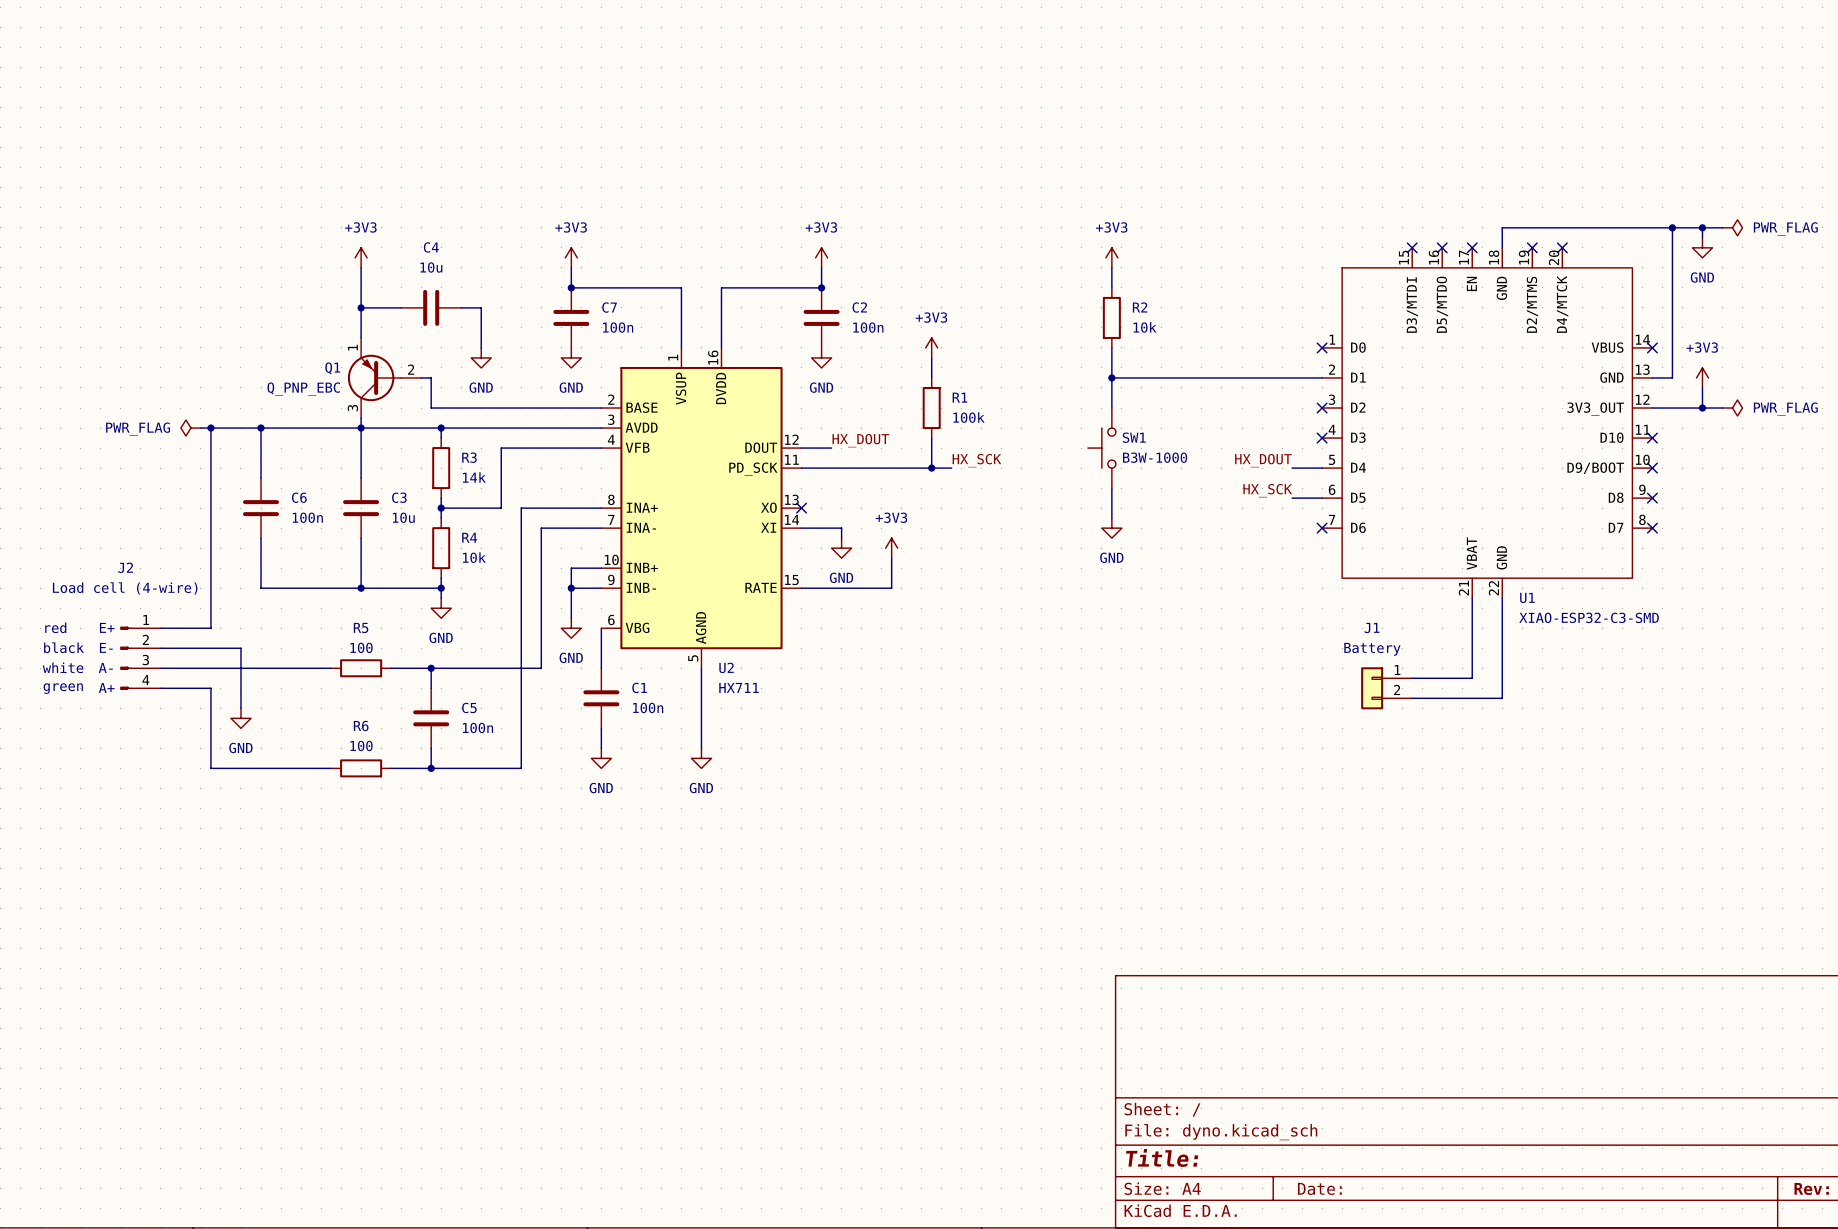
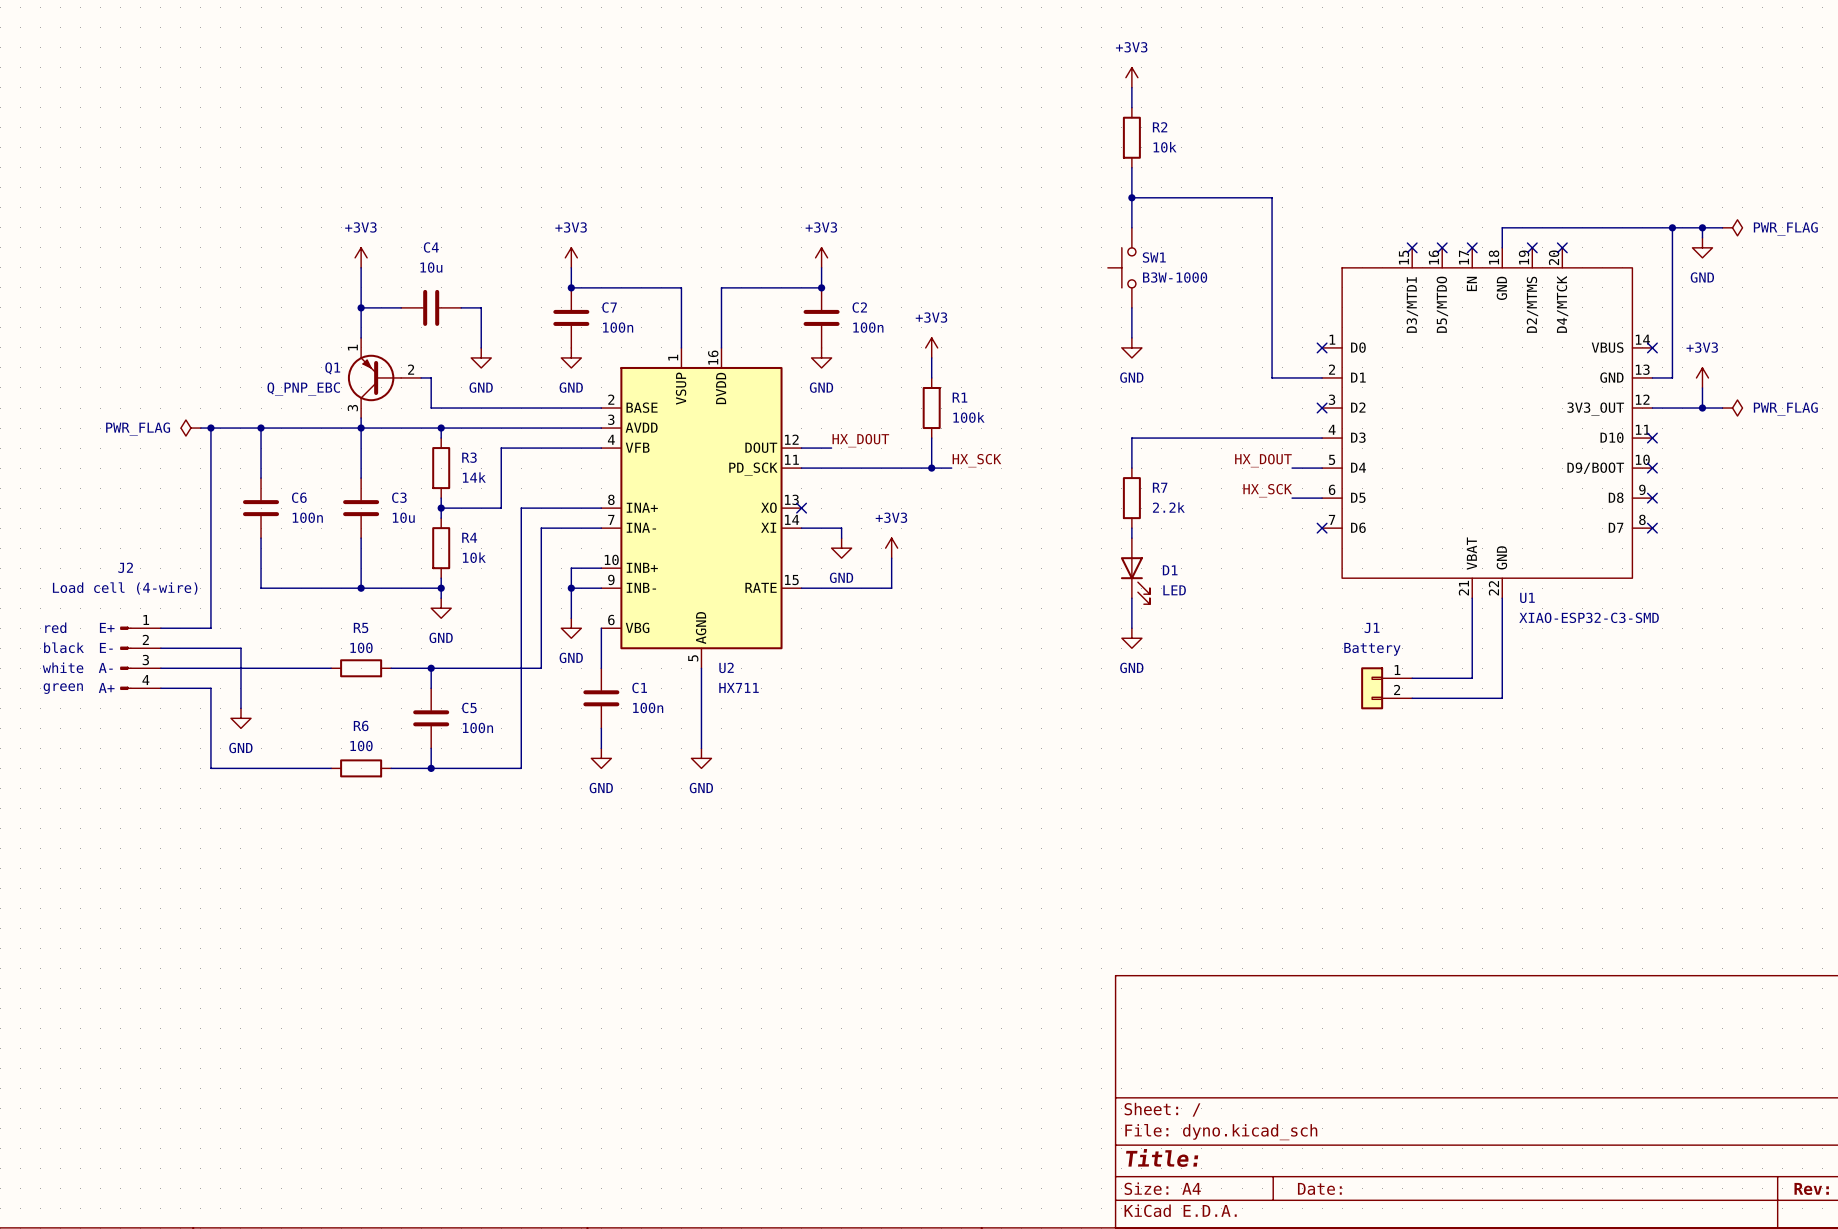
junction: none -> (1131, 197)
power symbol position: +3V3 (1111, 257) -> +3V3 (1131, 77)
wire: (1111, 267) (1111, 287) -> (1131, 87) (1131, 107)
R2 position: (1111, 317) -> (1131, 137)
wire: (1111, 347) (1111, 408) -> (1131, 167) (1131, 227)
power symbol: none -> GND (1131, 347)
wire: (1111, 377) (1272, 377) -> (1131, 197) (1272, 197) (1272, 377)
junction: (1111, 377) -> none
wire: none -> (1322, 438) (1131, 438) (1131, 468)
no-connect mark: (1322, 438) -> none
SW1 position: (1101, 448) -> (1121, 267)
wire: (1111, 488) (1111, 518) -> (1131, 307) (1131, 337)
R7: none -> 2.2k (1131, 498)
power symbol: GND (1111, 528) -> none
wire: none -> (1131, 528) (1131, 538)
D1: none -> LED (1135, 571)
wire: none -> (1131, 598) (1131, 628)
power symbol: none -> GND (1131, 638)

